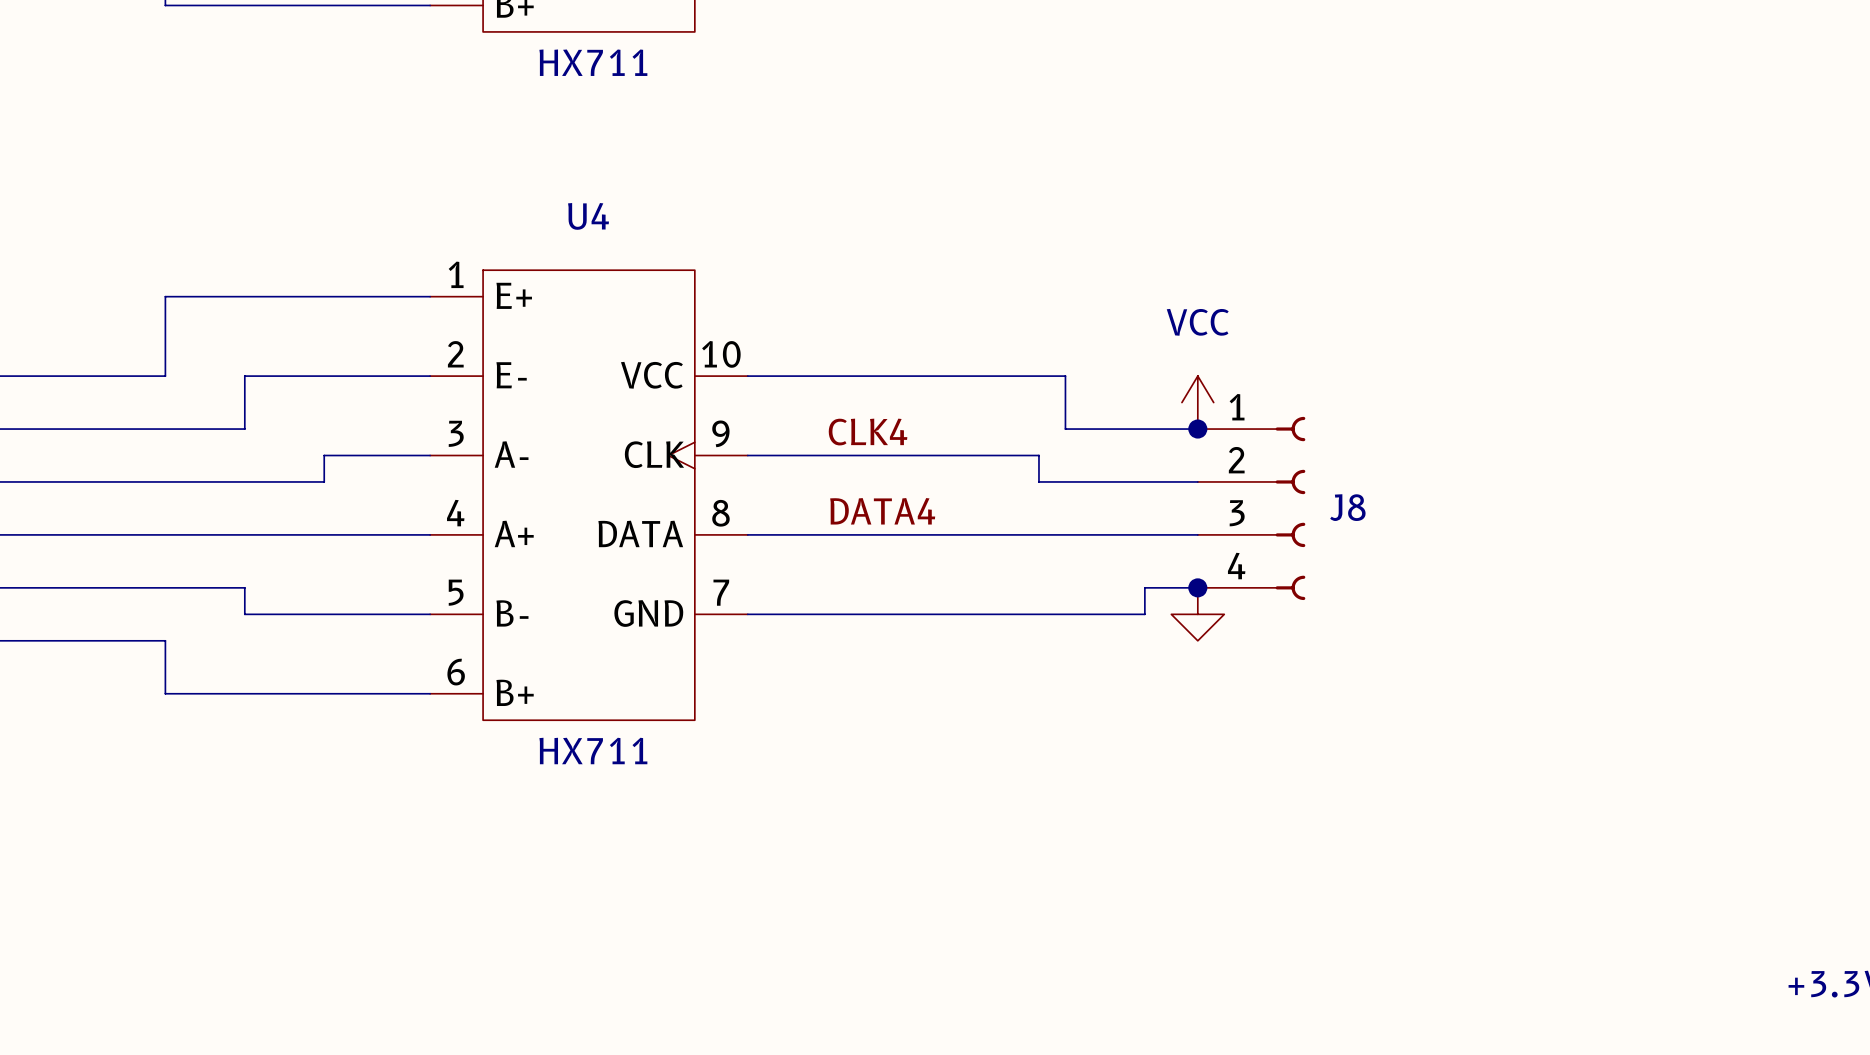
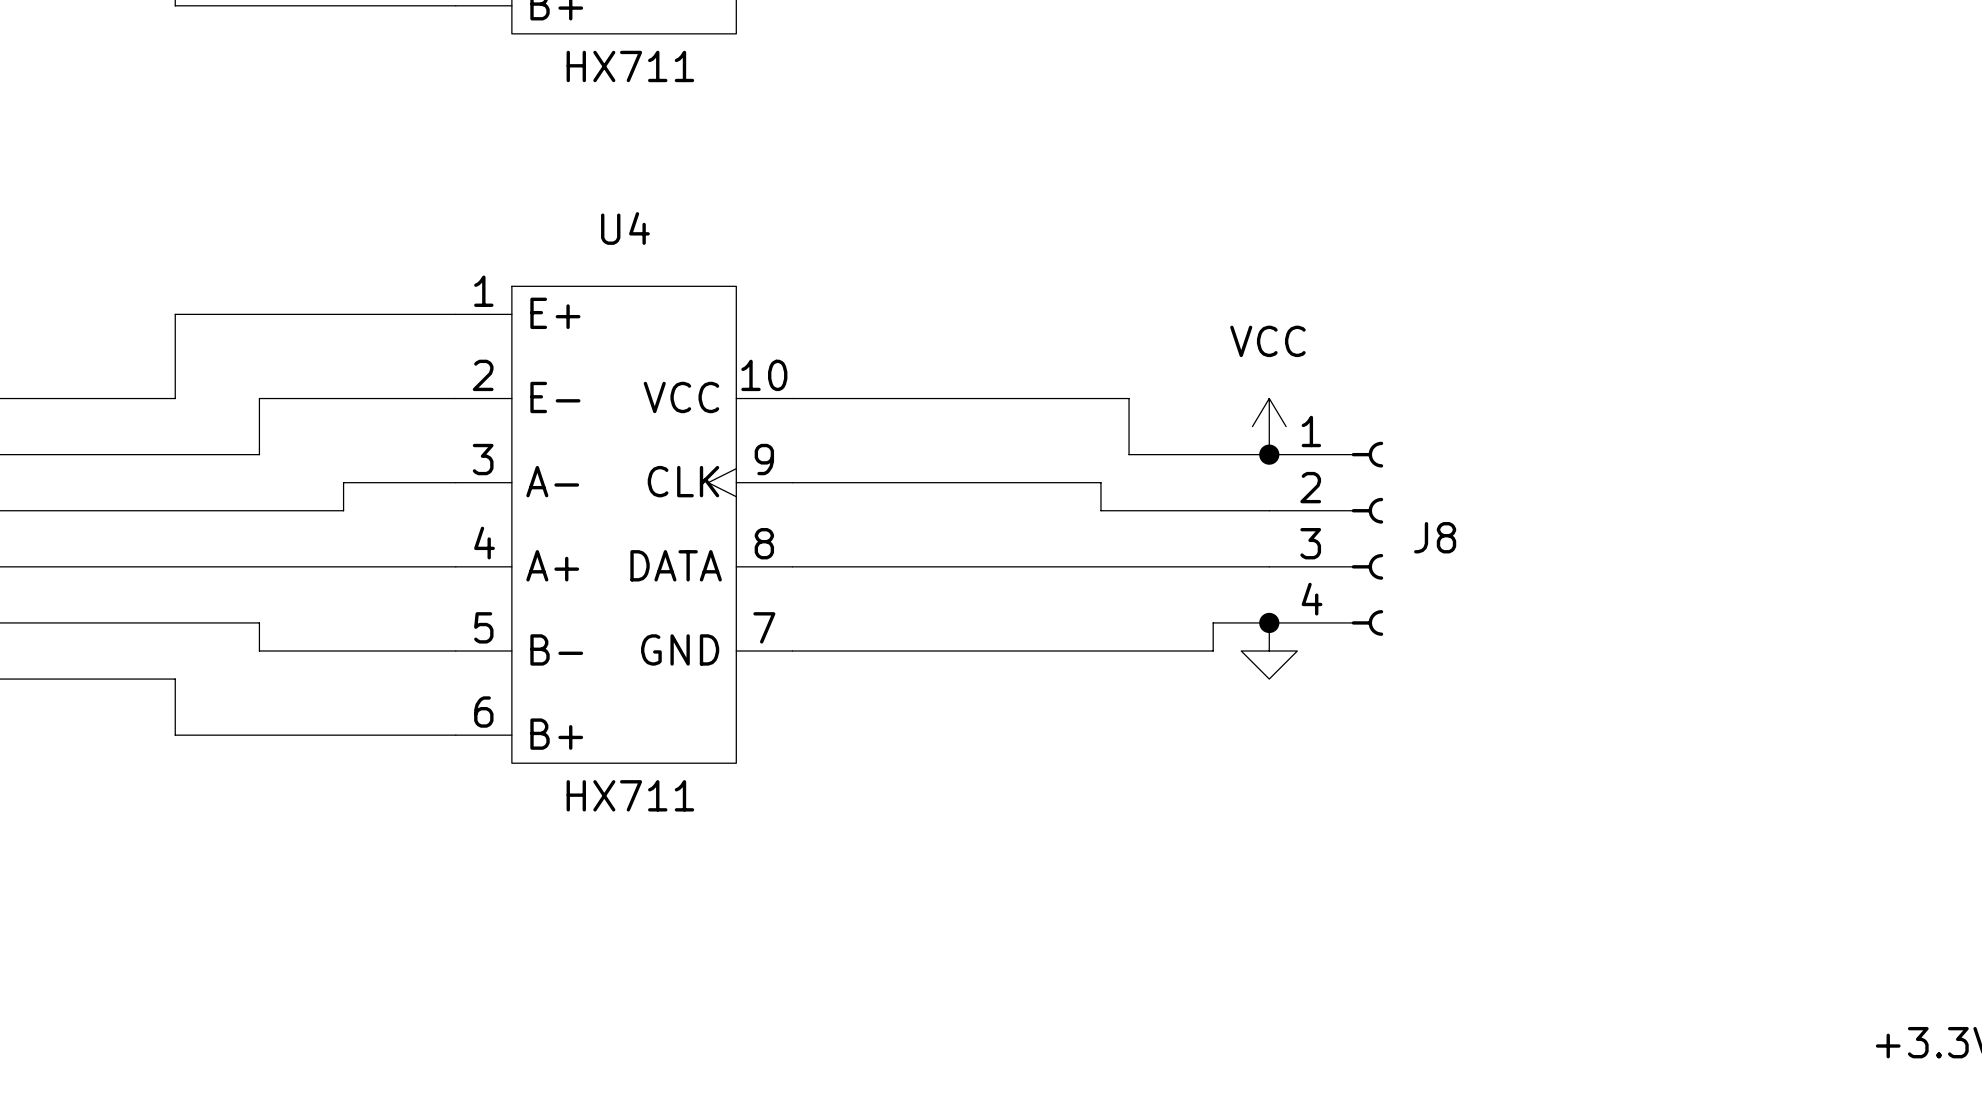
label: CLK4 (868, 432) -> none
label: DATA4 (882, 511) -> none

